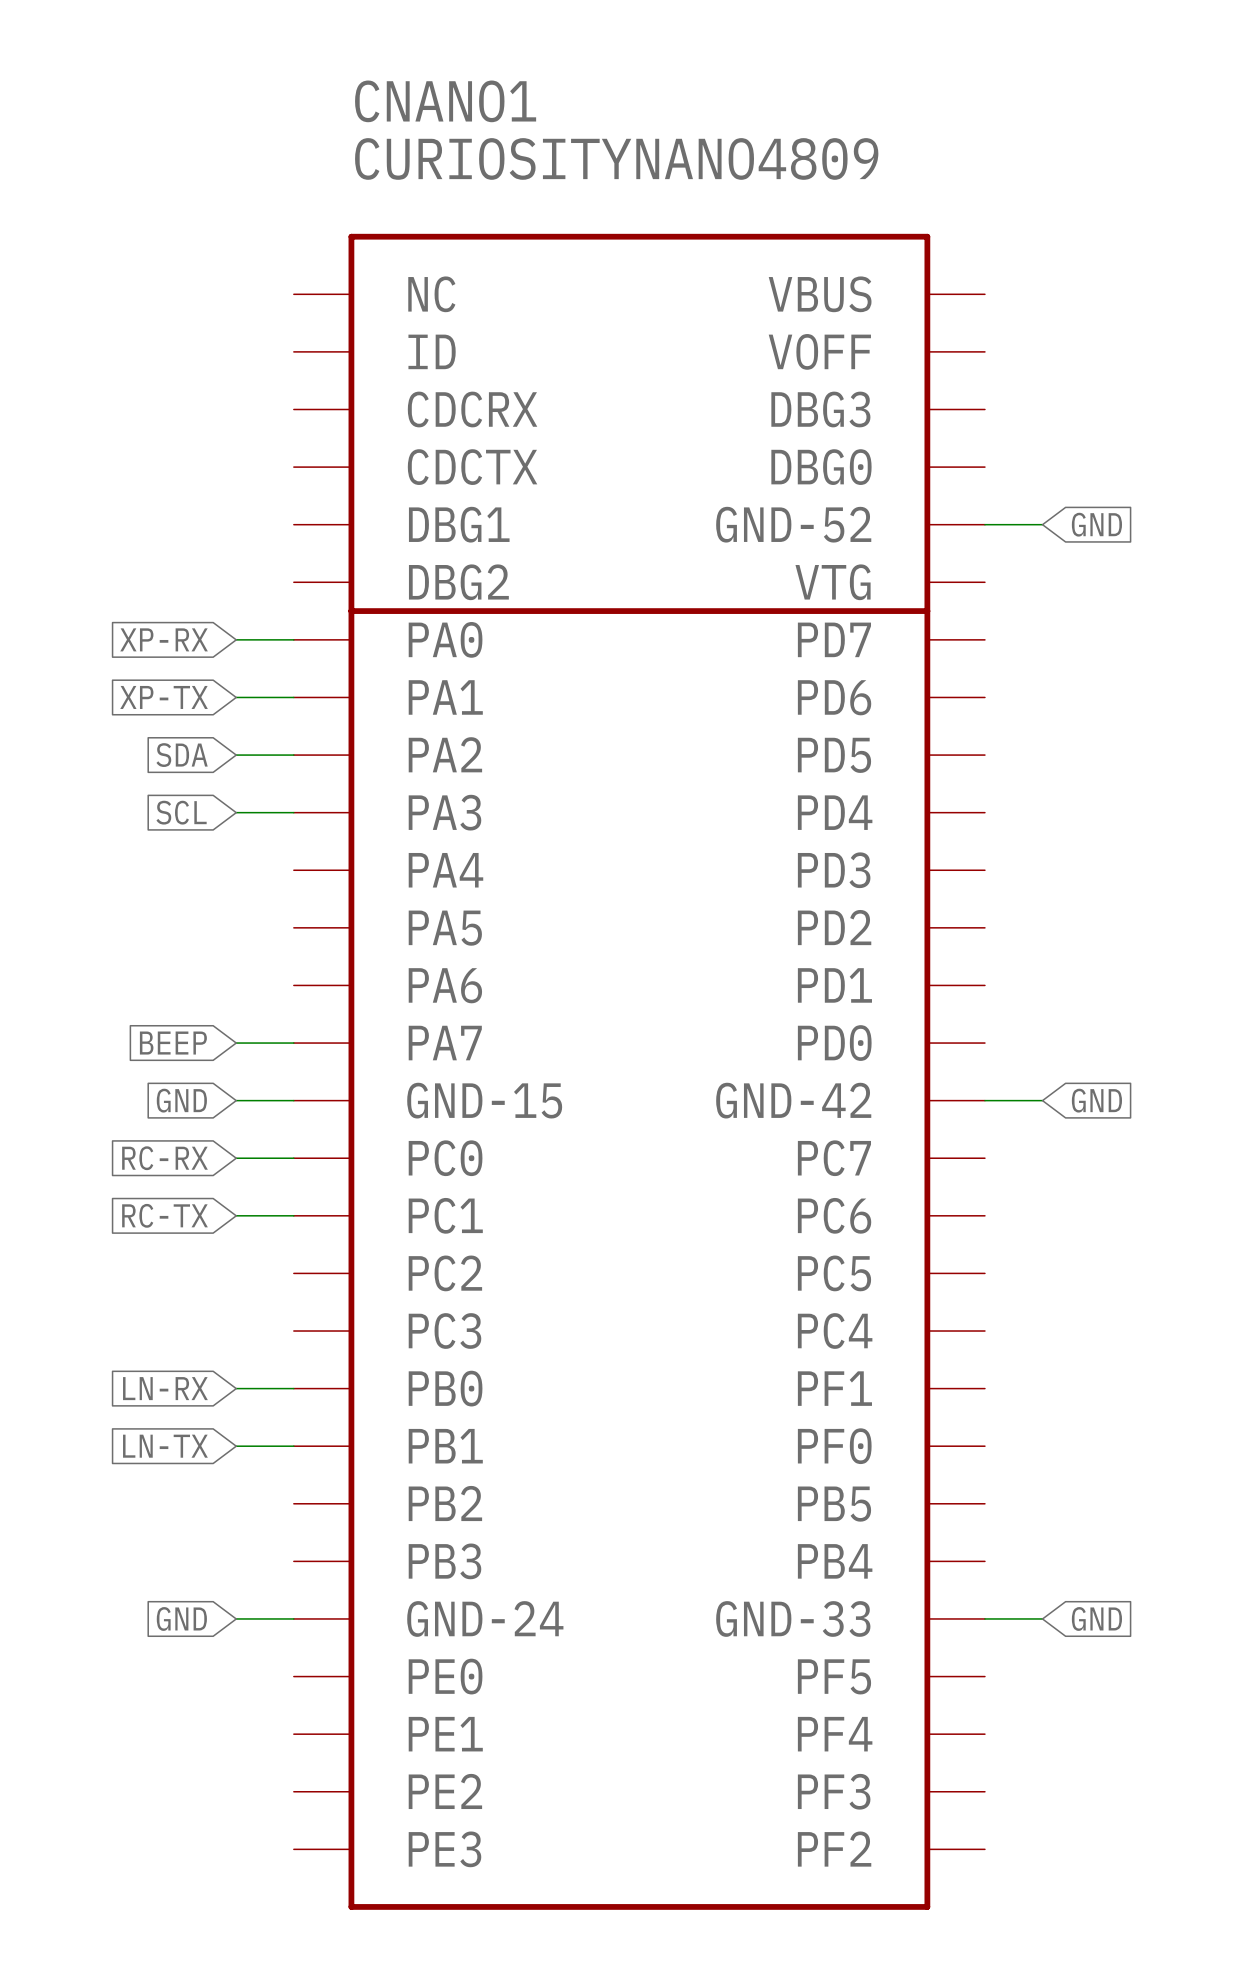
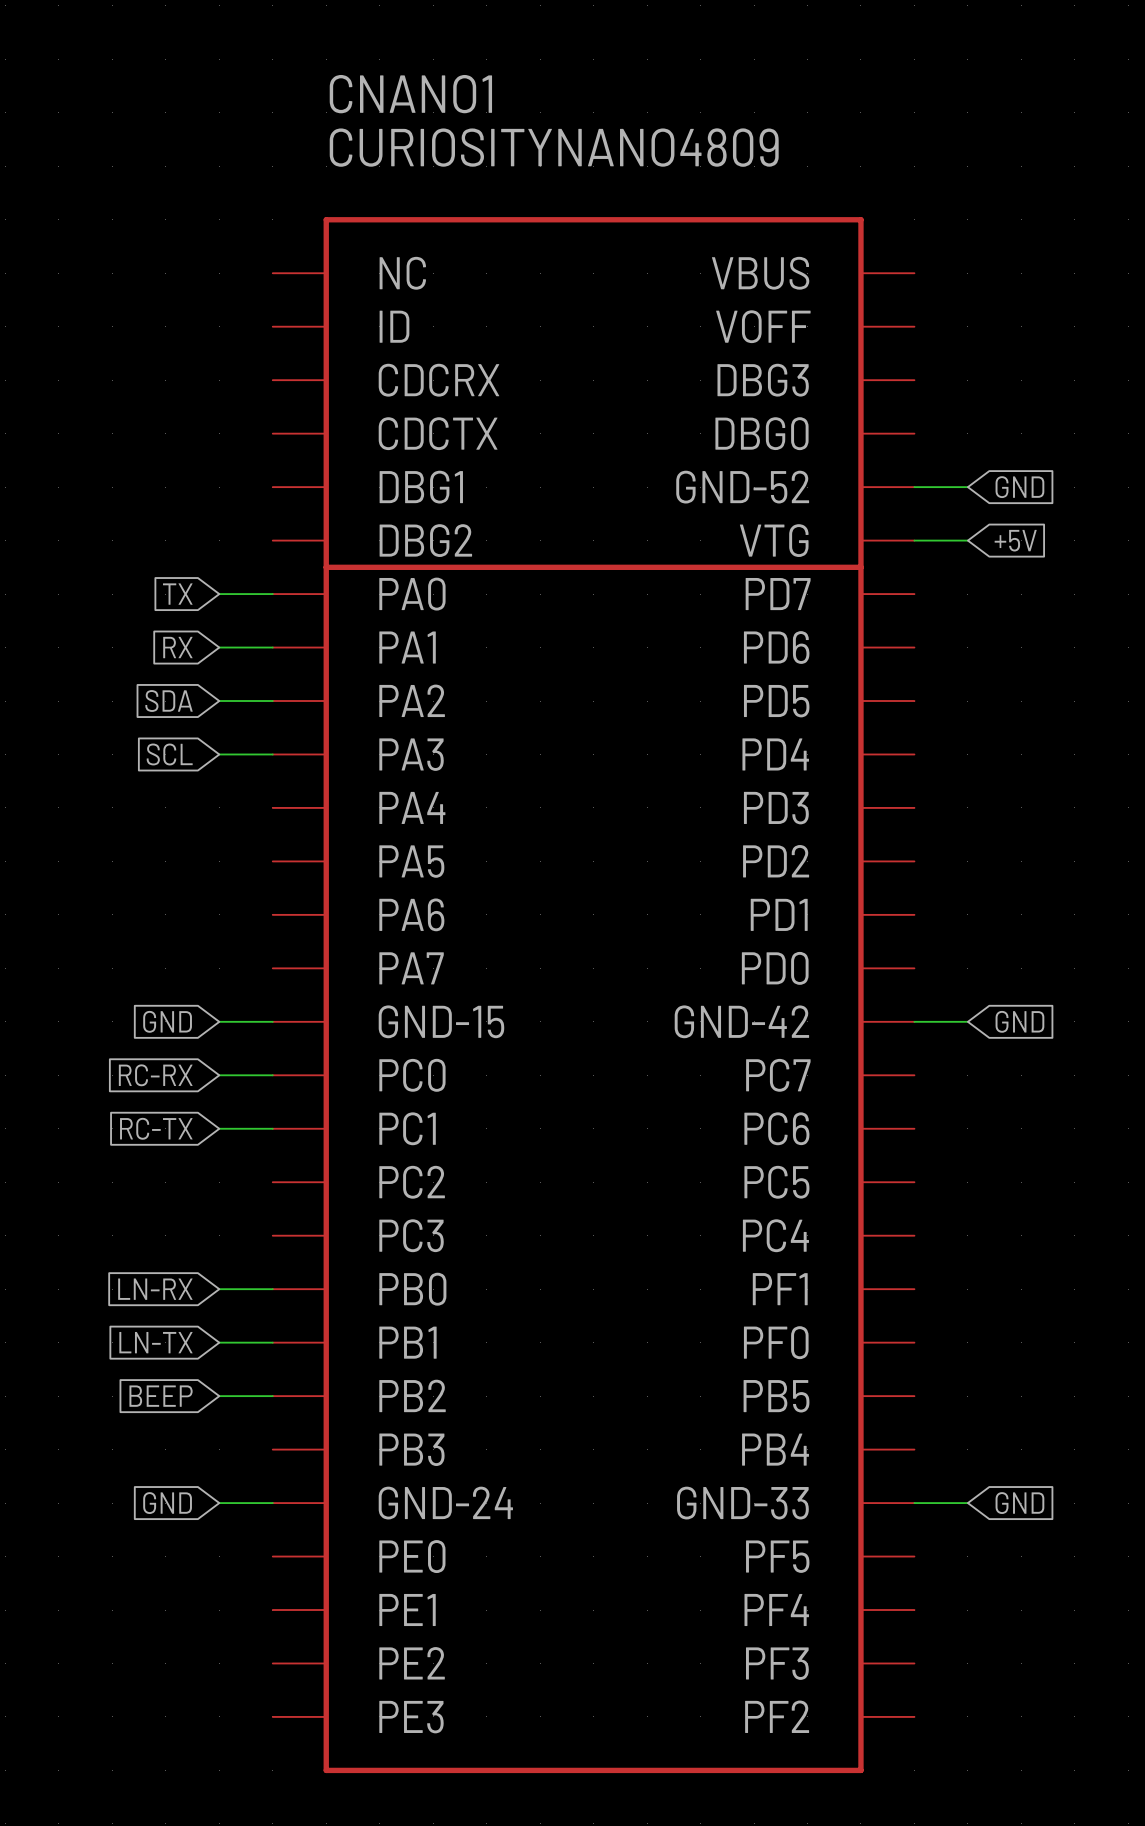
wire: none -> (914, 540) (967, 540)
global label: none -> +5V (1015, 540)
global label: XP-RX (164, 639) -> TX (177, 594)
global label: XP-TX (164, 697) -> RX (177, 647)
global label position: BEEP (173, 1043) -> BEEP (161, 1396)
wire: (236, 1043) (293, 1043) -> (219, 1396) (272, 1396)

